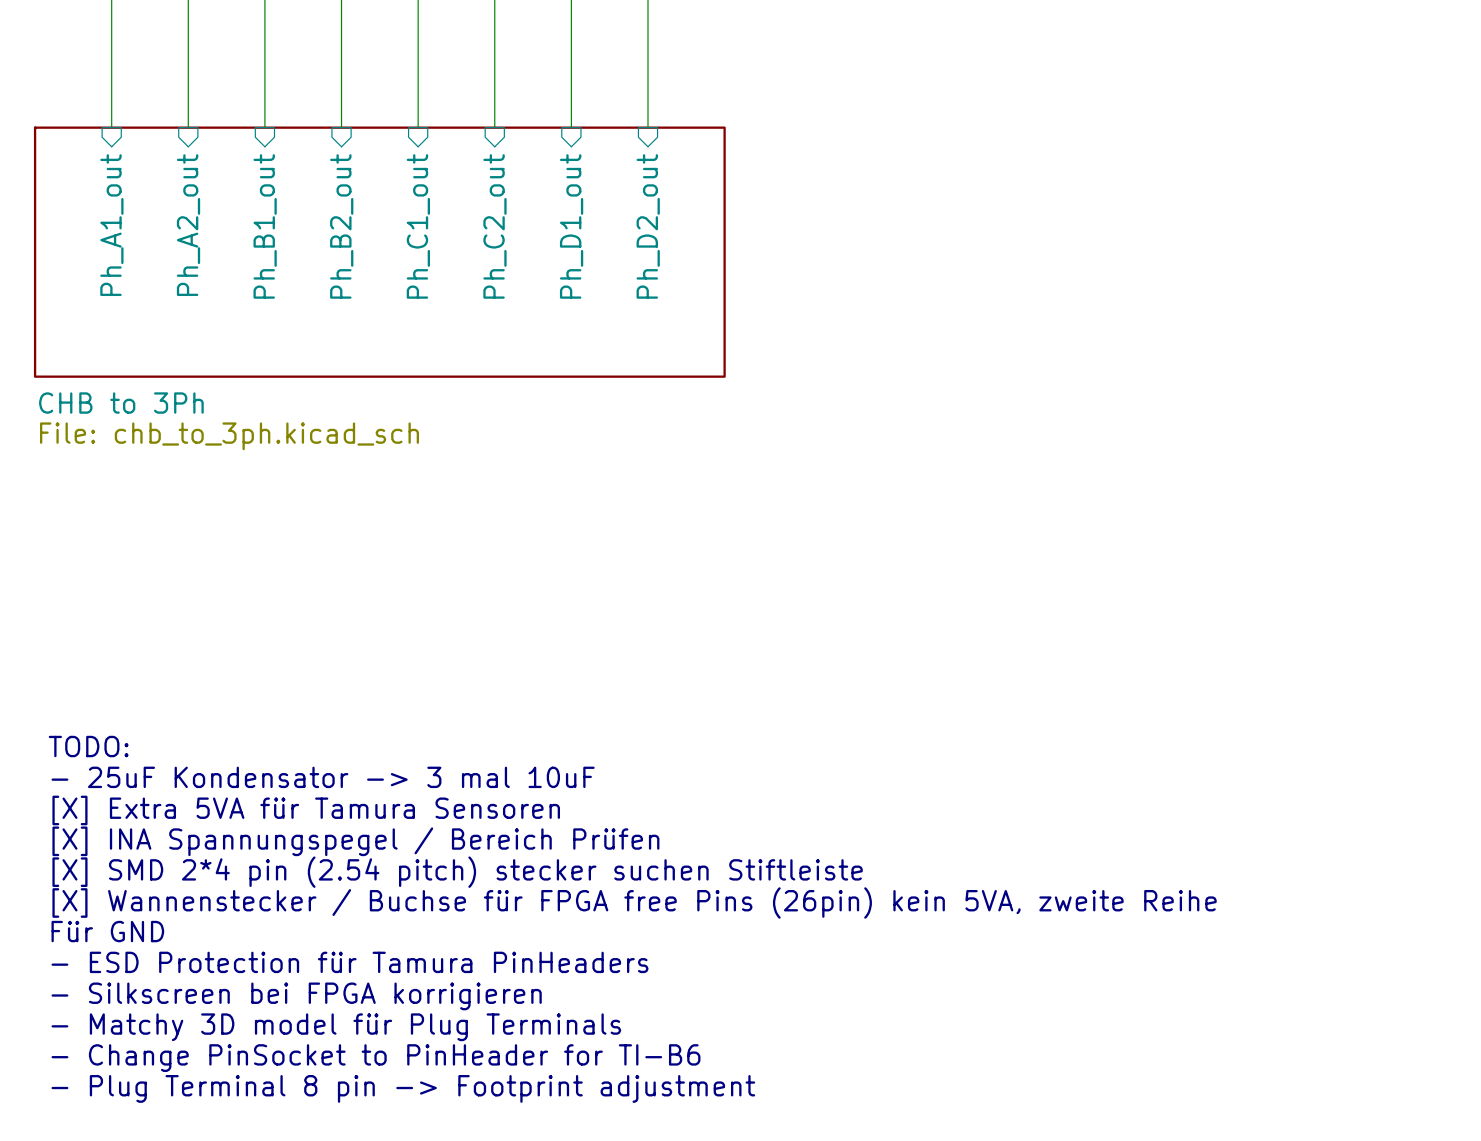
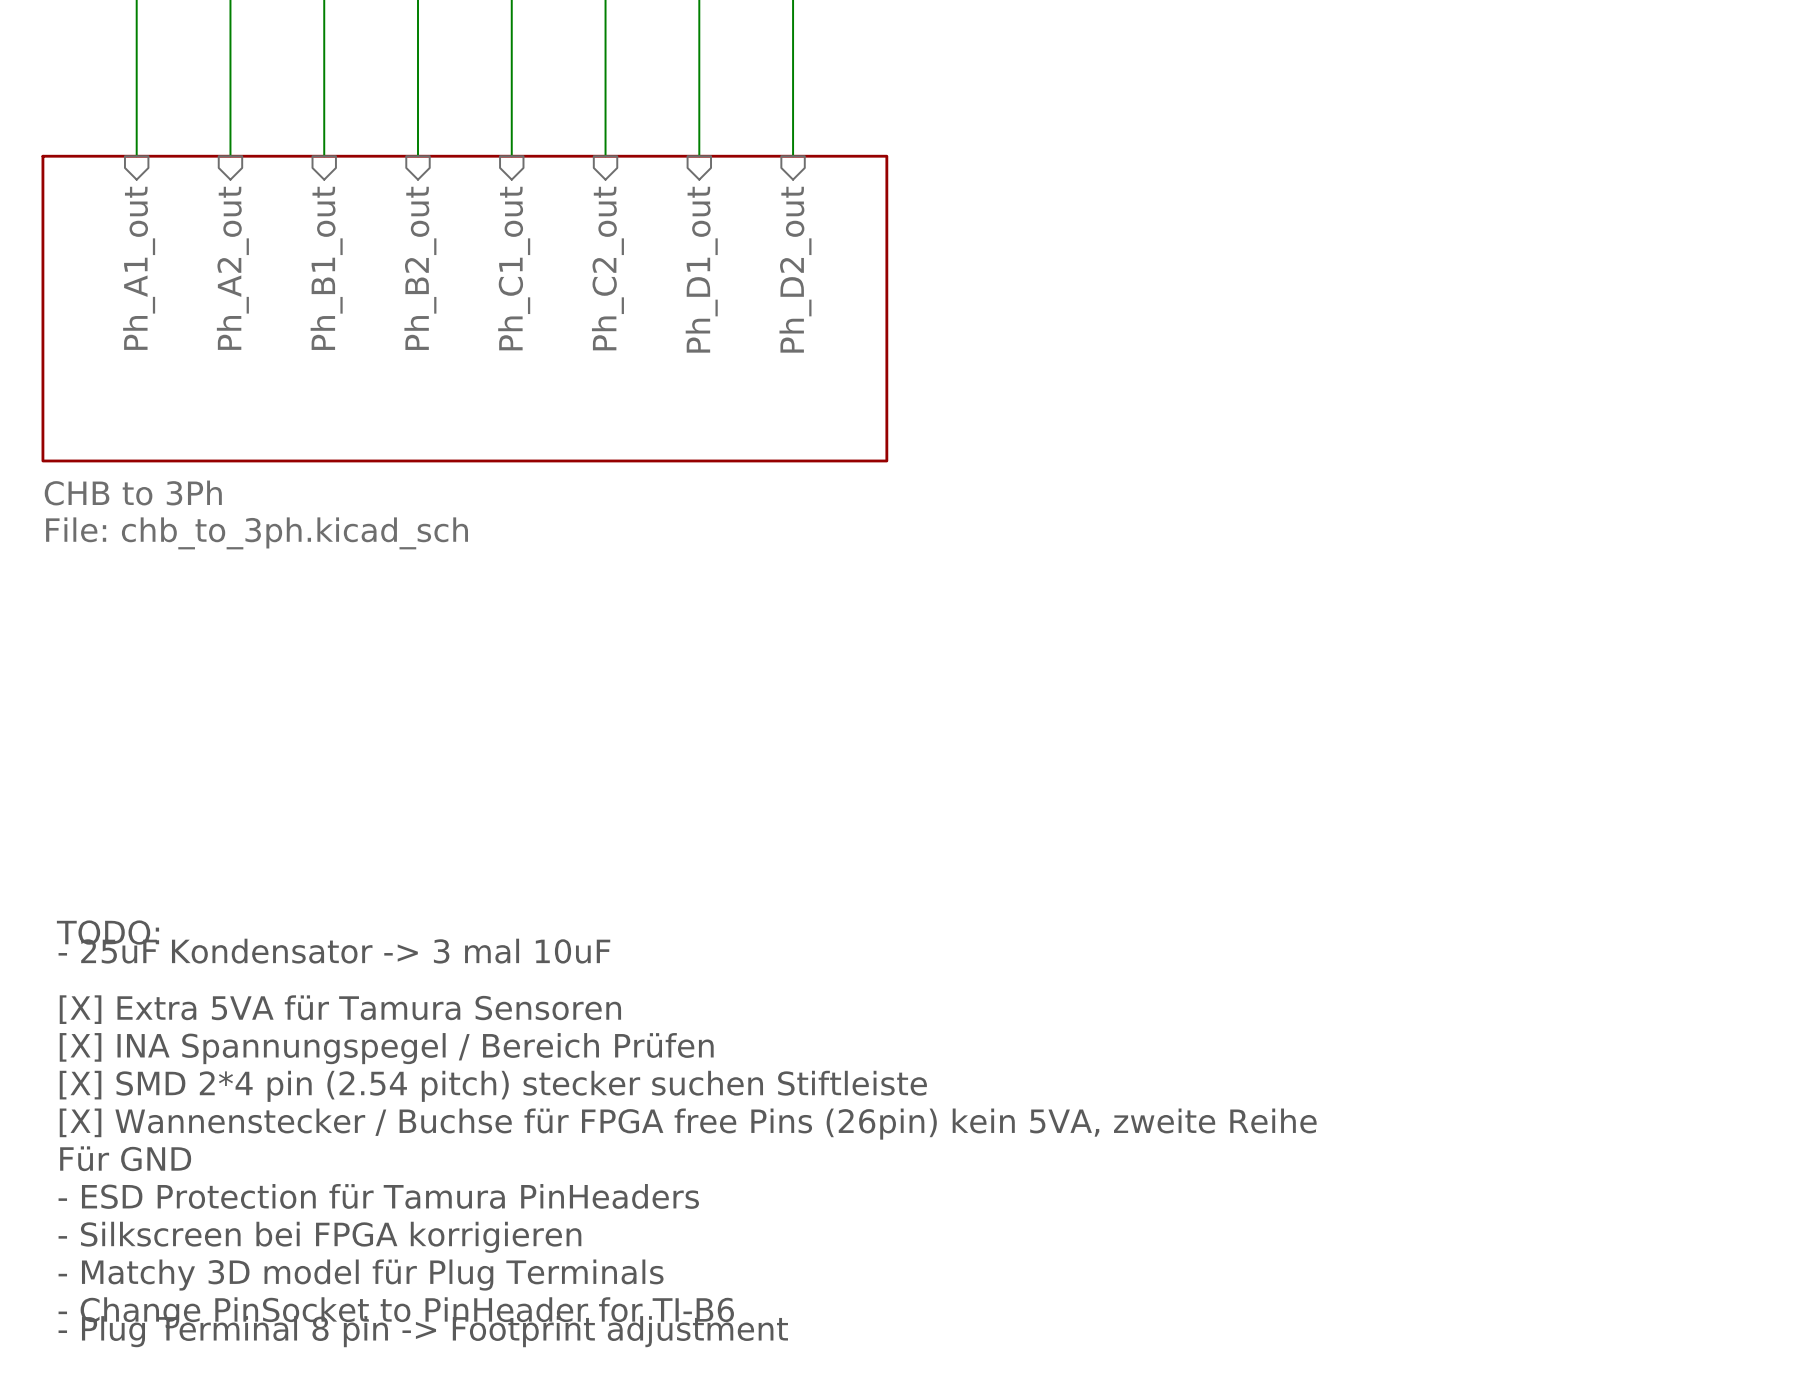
text position: TODO: (88, 746) -> TODO: (107, 932)
text position: [X] Extra 5VA für Tamura Sensoren (306, 810) -> [X] Extra 5VA für Tamura Sensoren (340, 1009)
text position: [X] INA Spannungspegel / Bereich Prüfen (355, 841) -> [X] INA Spannungspegel / Bereich Prüfen (386, 1048)
text position: [X] SMD 2*4 pin (2.54 pitch) stecker suchen Stiftleiste (457, 872) -> [X] SMD 2*4 pin (2.54 pitch) stecker suchen Stiftleiste (493, 1086)
text position: [X] Wannenstecker / Buchse für FPGA free Pins (26pin) kein 5VA, zweite Reihe (634, 902) -> [X] Wannenstecker / Buchse für FPGA free Pins (26pin) kein 5VA, zweite Reihe (688, 1124)
text position: Für GND (107, 931) -> Für GND (125, 1158)
text position: - ESD Protection für Tamura PinHeaders (349, 962) -> - ESD Protection für Tamura PinHeaders (378, 1196)
text position: - Silkscreen bei FPGA korrigieren (296, 996) -> - Silkscreen bei FPGA korrigieren (319, 1237)
text position: - Matchy 3D model für Plug Terminals (336, 1027) -> - Matchy 3D model für Plug Terminals (361, 1275)
text position: - Change PinSocket to PinHeader for TI-B6 (375, 1058) -> - Change PinSocket to PinHeader for TI-B6 (396, 1312)

